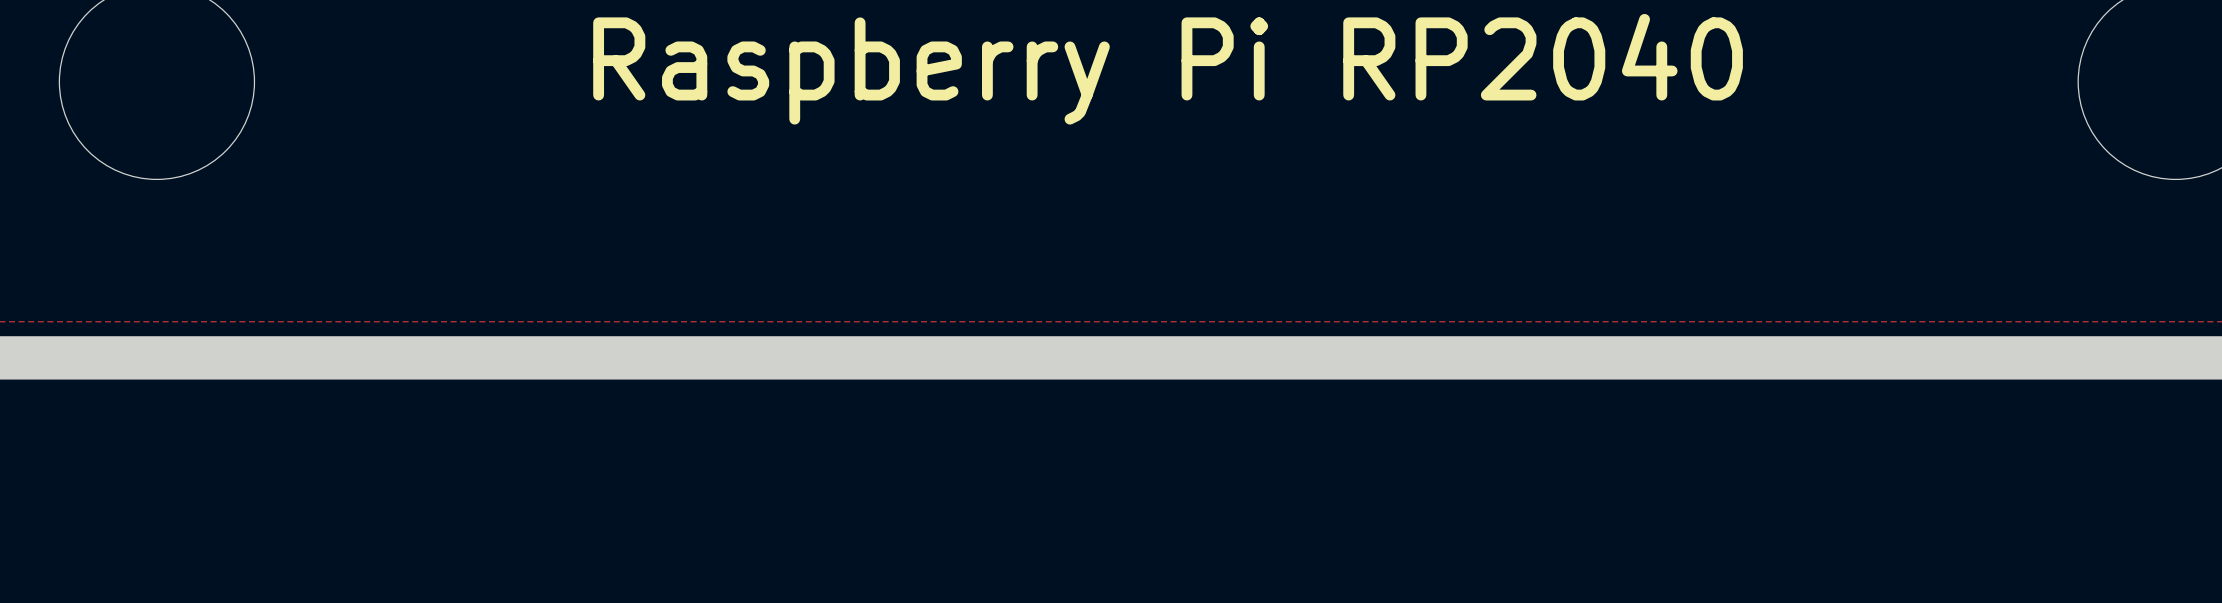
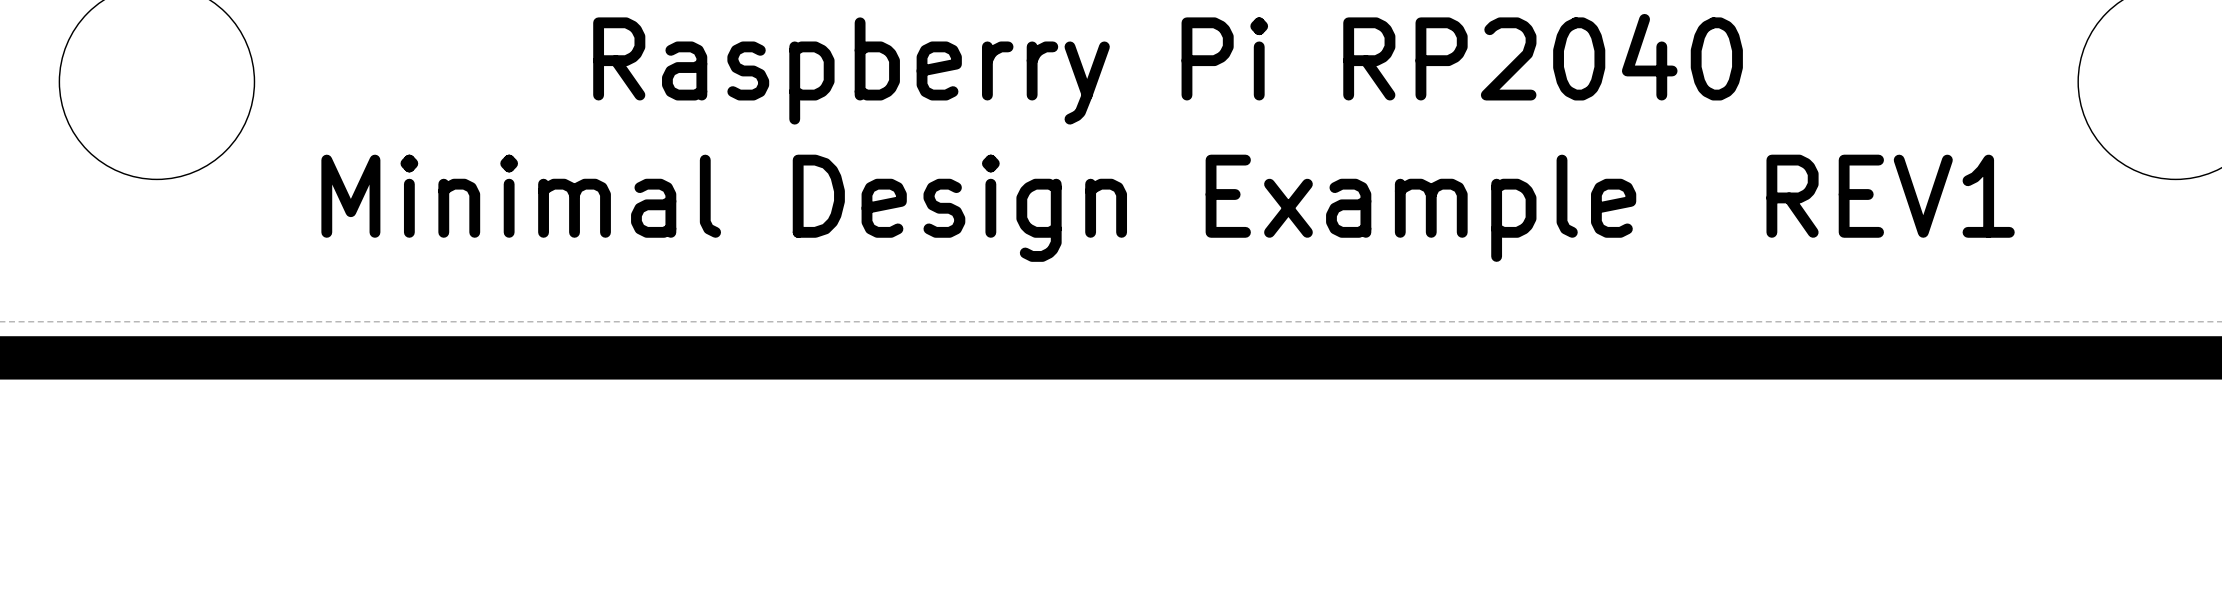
text: none -> Minimal Design Example REV1 (1168, 208)

